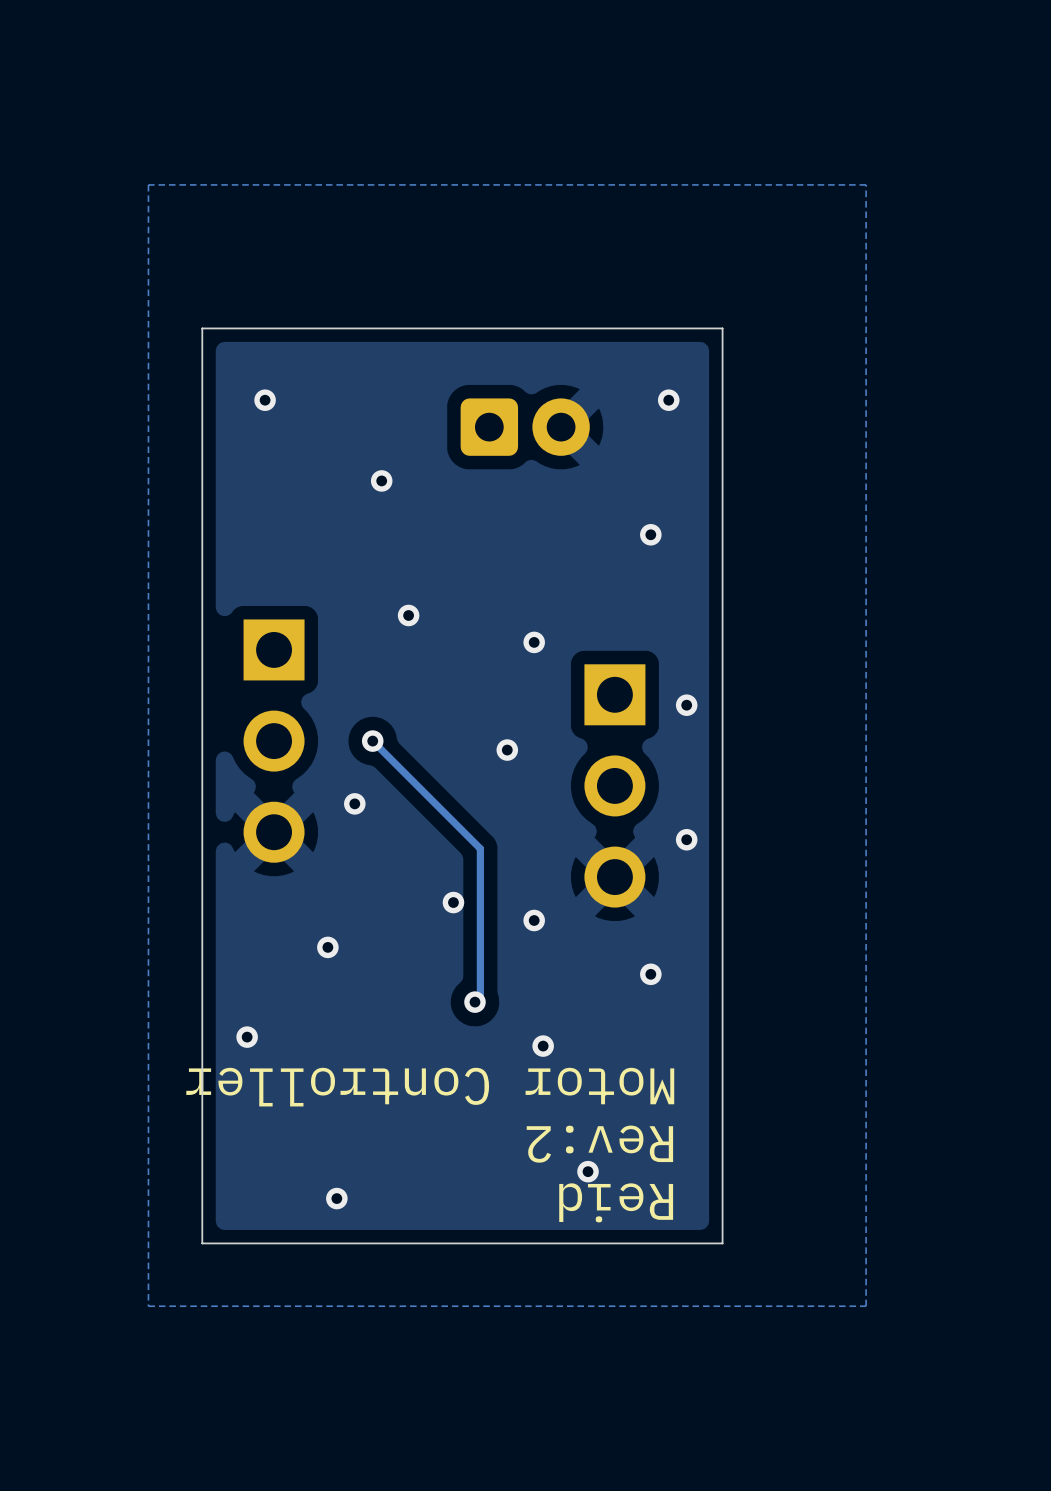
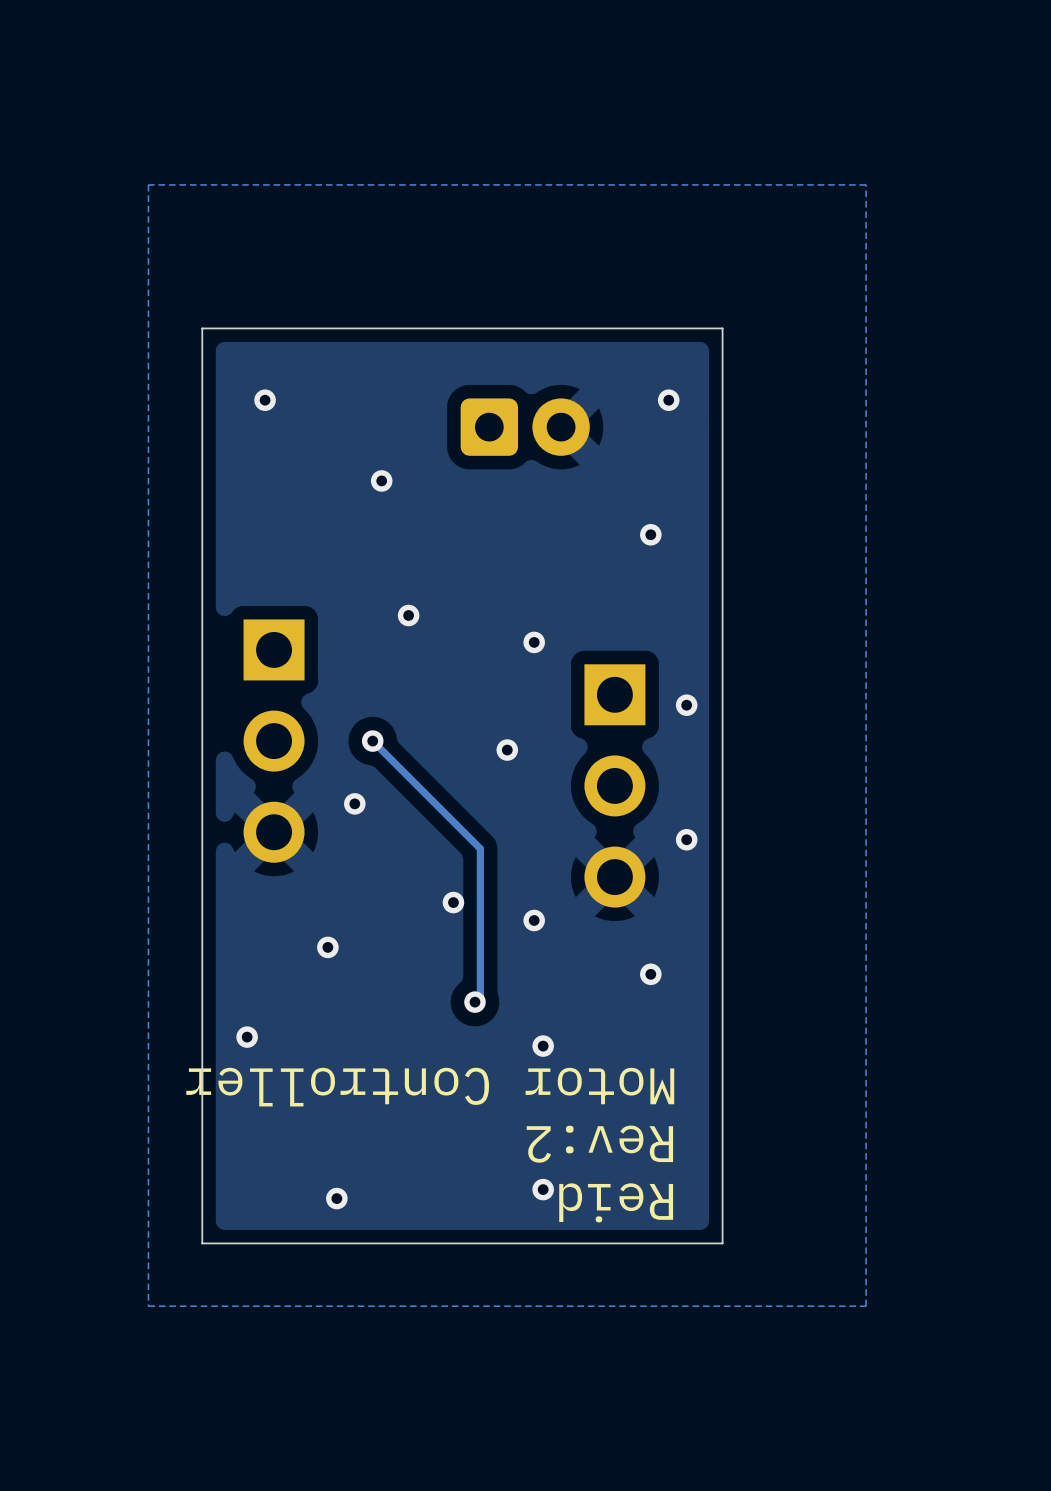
via position: (588, 1171) -> (543, 1189)

